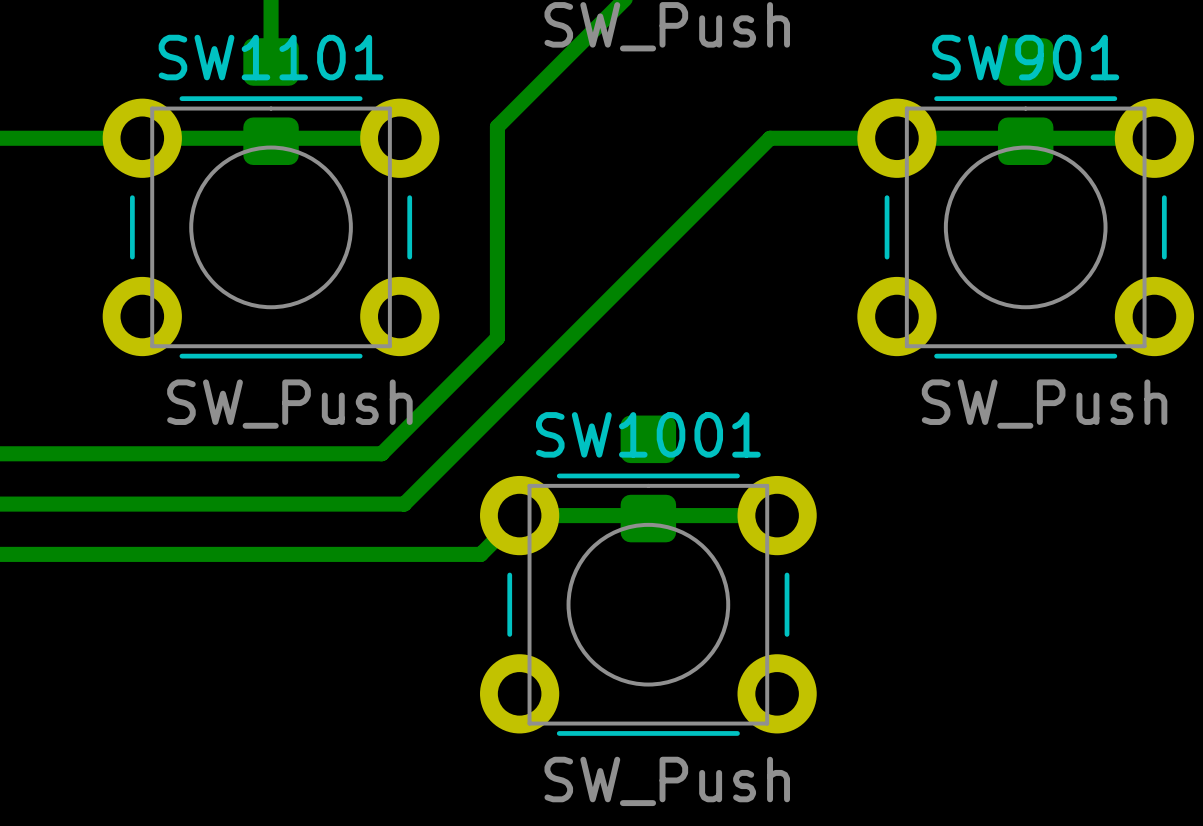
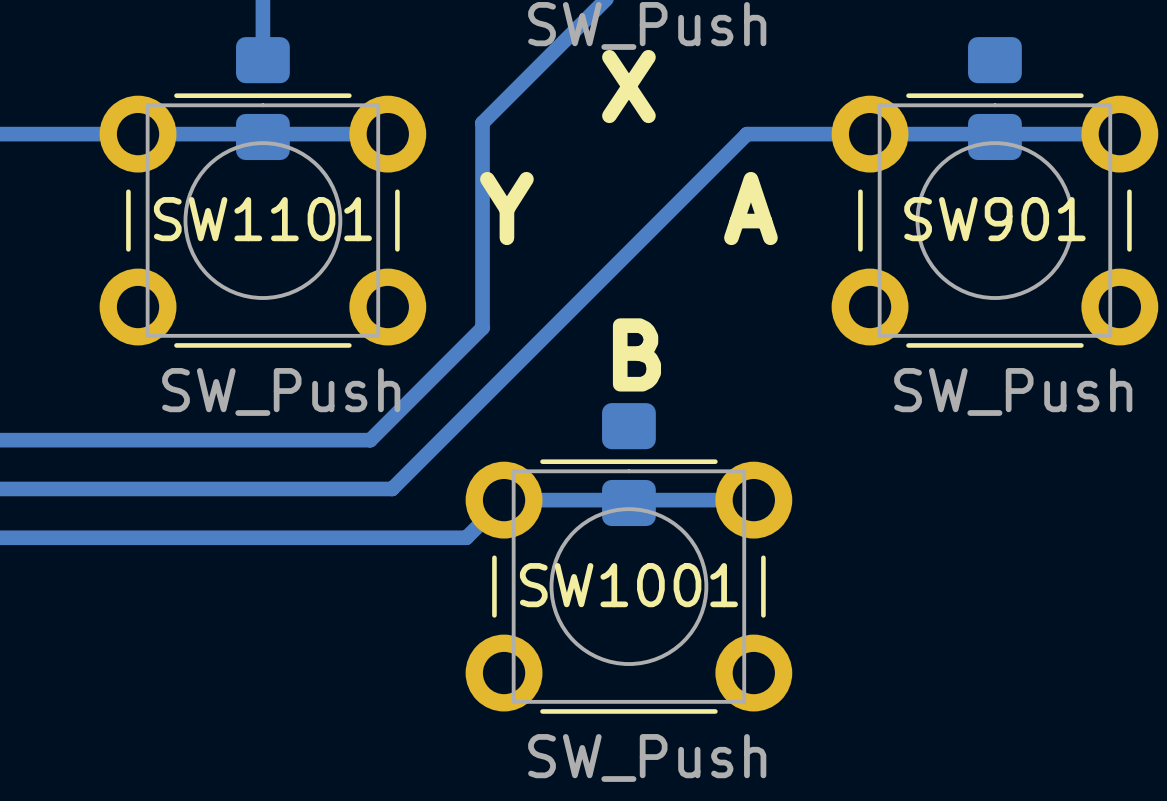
SW1101 name position: SW1101 (271, 57) -> SW1101 (262, 219)
SW901 name position: SW901 (1025, 57) -> SW901 (994, 219)
text: none -> X (628, 86)
text: none -> Y (506, 208)
text: none -> A (750, 208)
text: none -> B (636, 354)
SW1001 name position: SW1001 (648, 434) -> SW1001 (628, 585)

